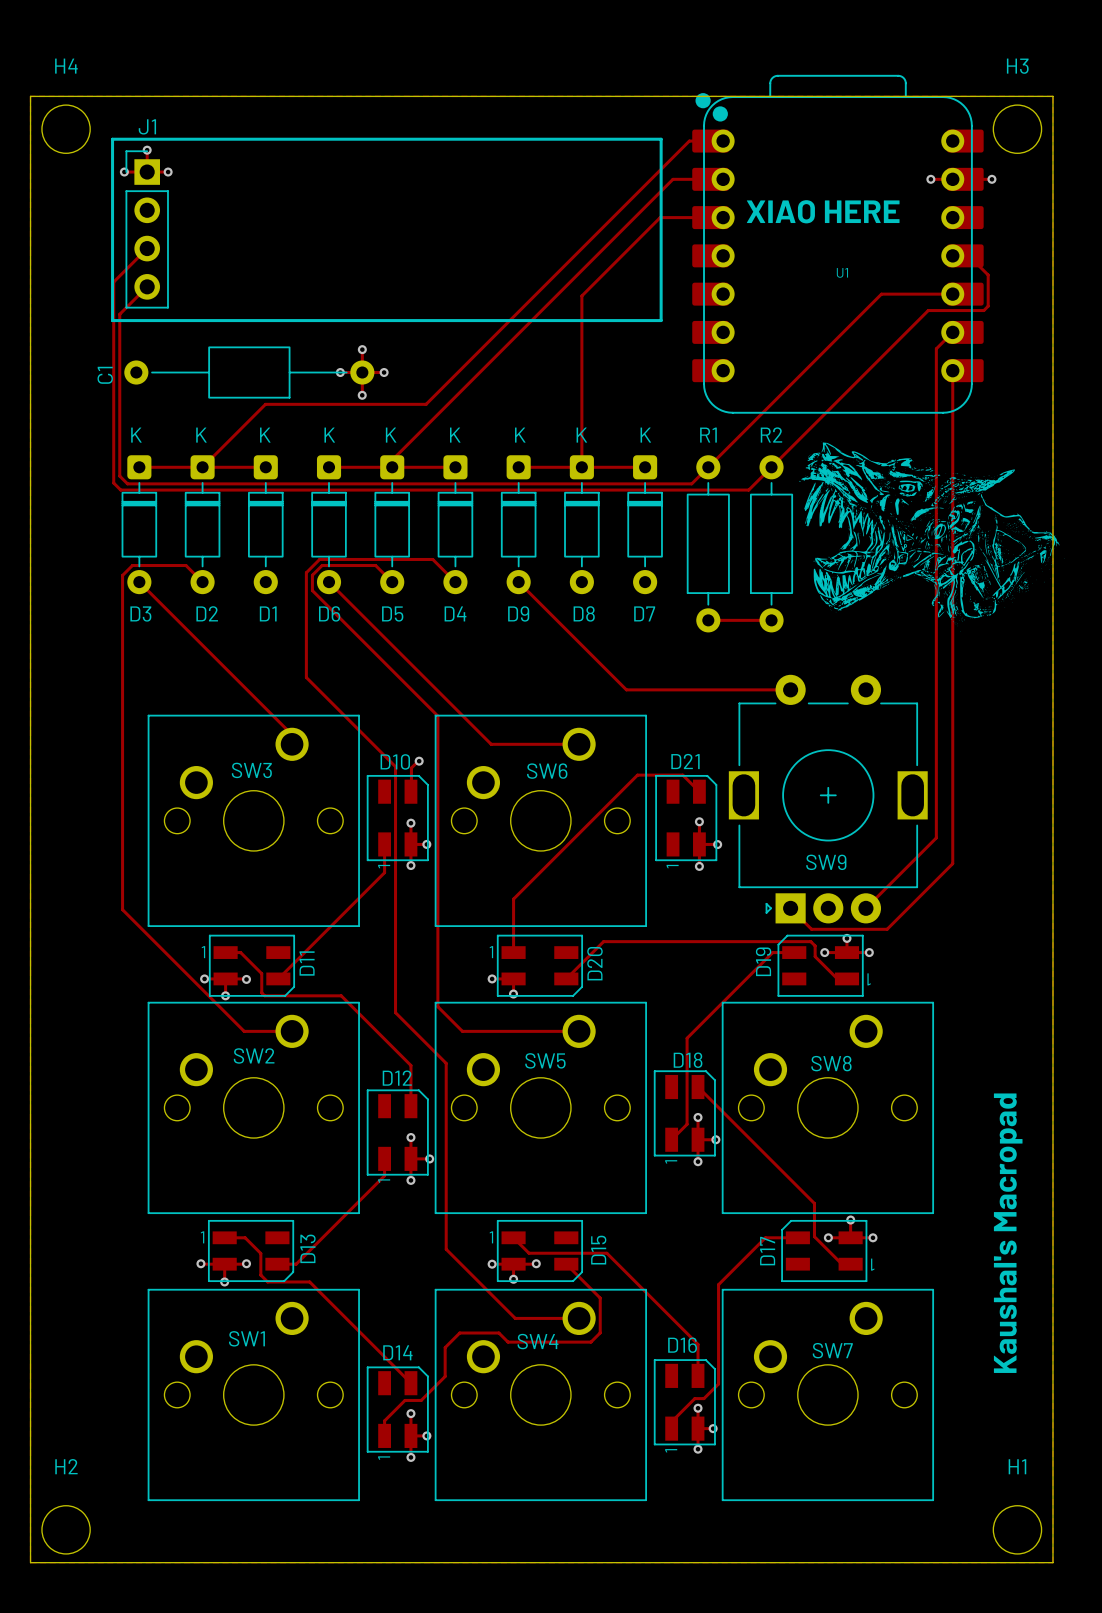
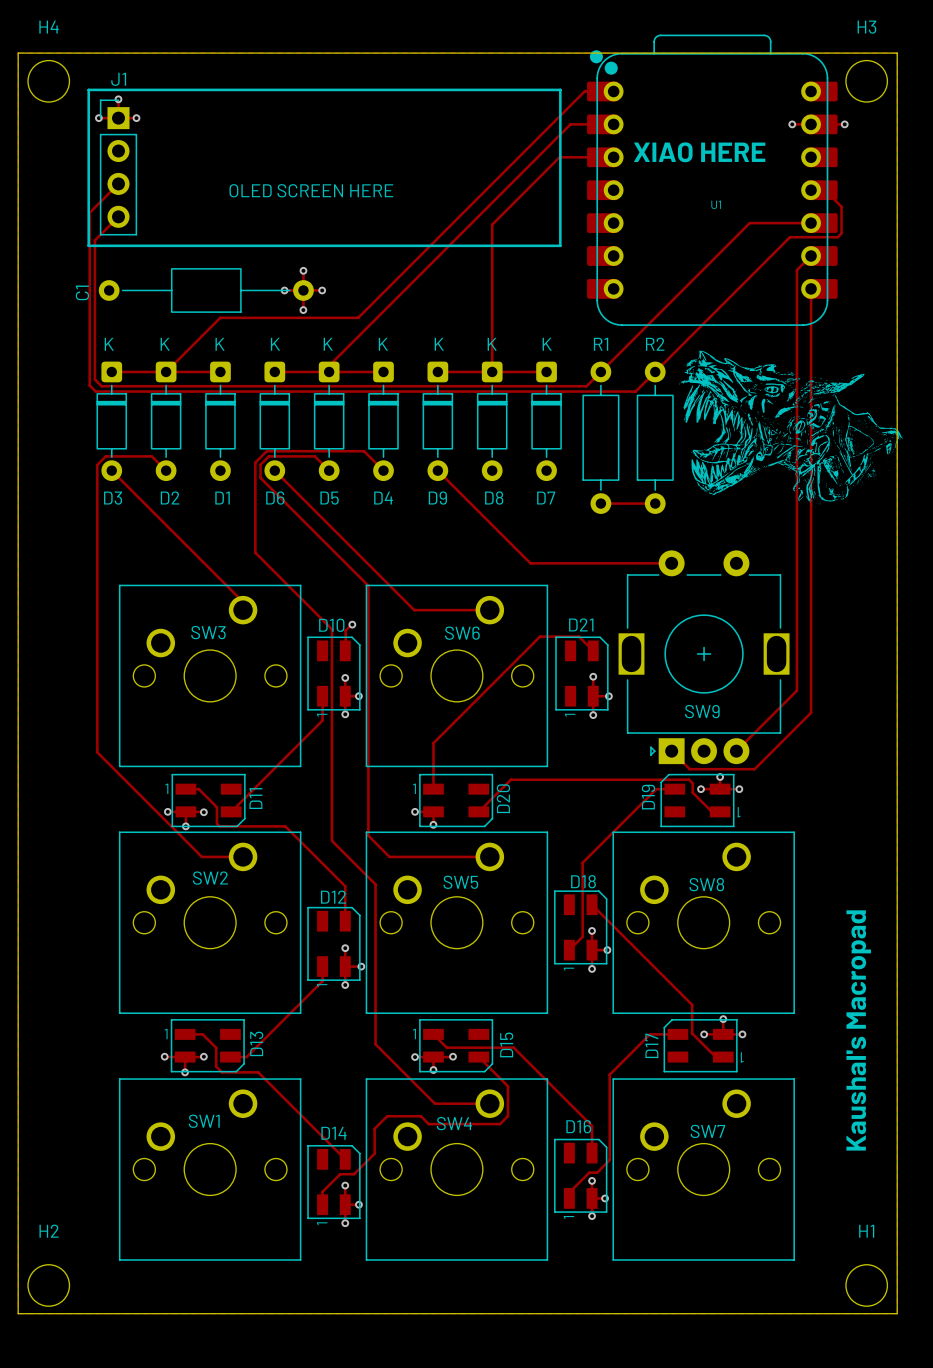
text: none -> OLED SCREEN HERE (311, 190)

